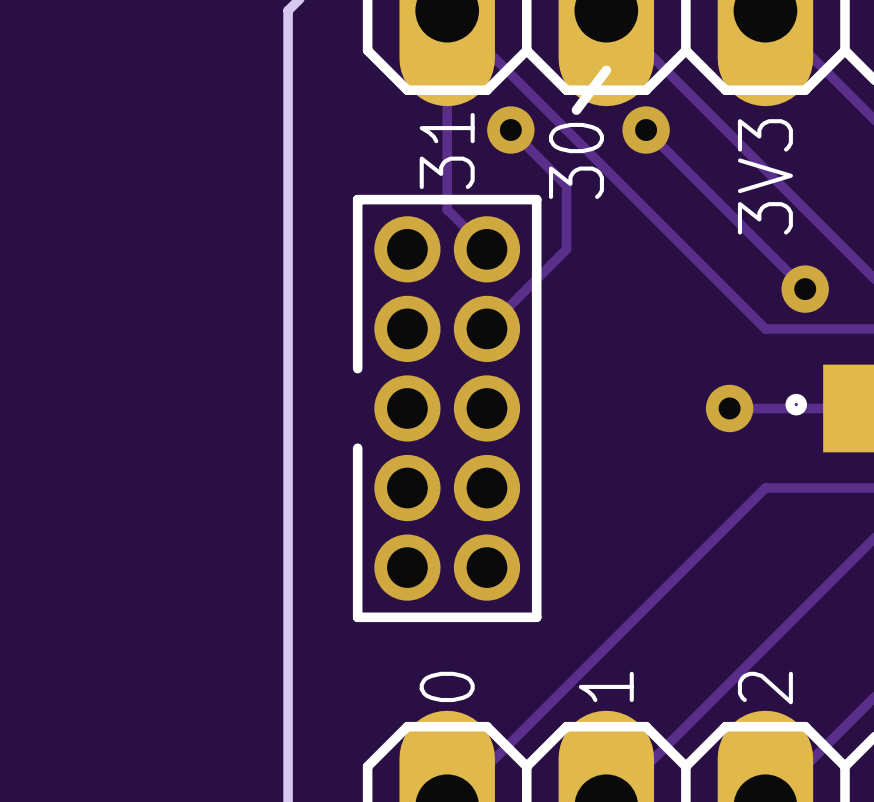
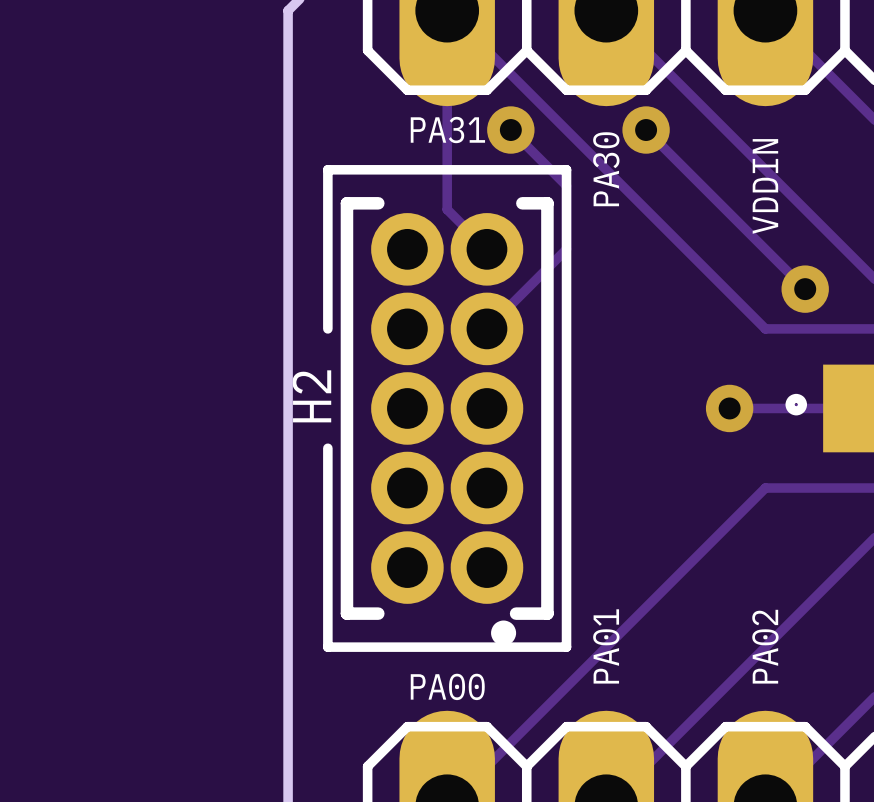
line: (606, 70) (576, 110) -> none
text: 31 (447, 150) -> PA31 (447, 130)
text: 30 (576, 160) -> PA30 (606, 169)
text: 3V3 (765, 176) -> VDDIN (765, 186)
via: (407, 249) -> none
via: (486, 249) -> none
line: none -> (327, 328) (327, 169) (566, 169) (566, 647) (327, 647) (327, 448)
via: (407, 328) -> none
via: (486, 328) -> none
line: (357, 368) (357, 199) (536, 199) (536, 617) (357, 617) (357, 448) -> none
via: (407, 408) -> none
via: (486, 408) -> none
H2: none -> (447, 421)
via: (407, 488) -> none
via: (486, 488) -> none
via: (407, 567) -> none
via: (486, 567) -> none
text: 0 (447, 686) -> PA00 (447, 686)
text: 1 (606, 686) -> PA01 (606, 646)
text: 2 (765, 688) -> PA02 (765, 646)

